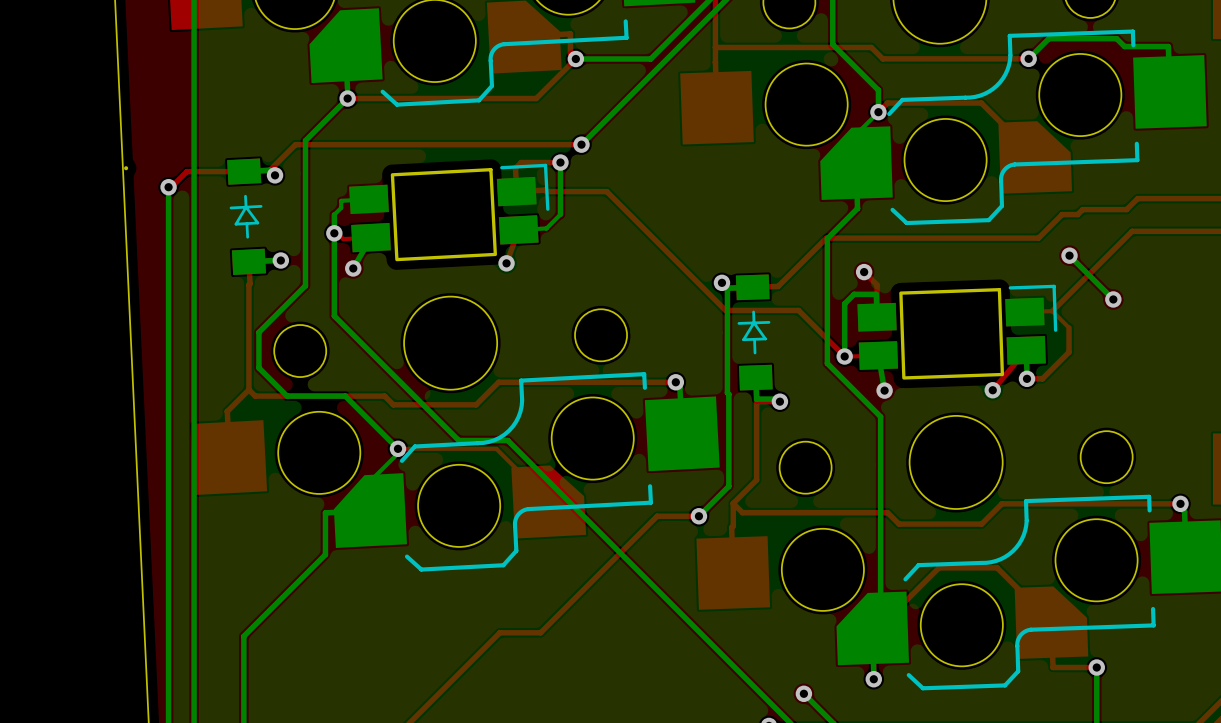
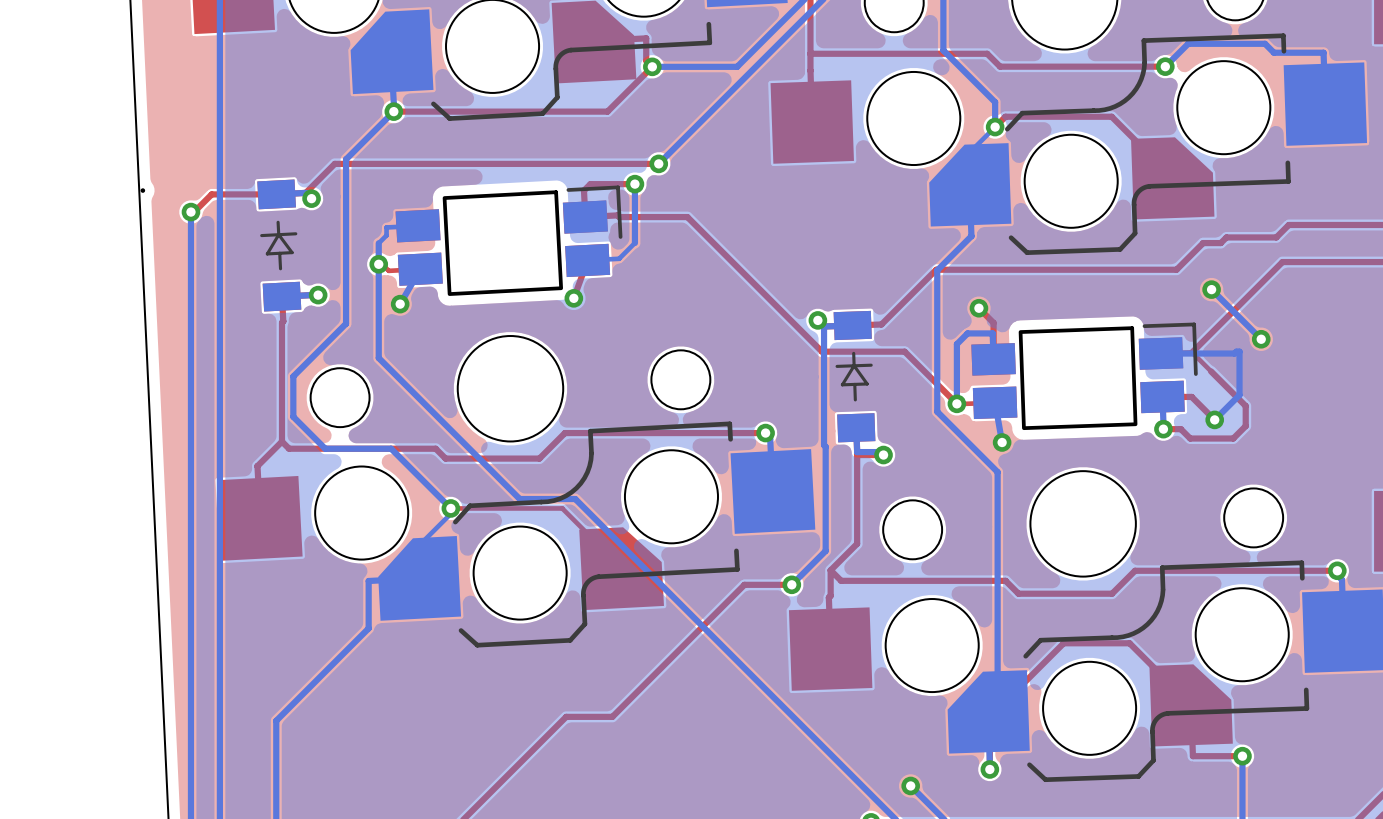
bottom track: none -> (1161, 353) (1234, 353) (1239, 351) (1239, 395) (1214, 419)
top track: (1069, 327) (1069, 352) (1042, 378) -> (1211, 371) (1245, 406) (1245, 426) (1233, 438) (1190, 438) (1180, 429)
top track: (1026, 350) (992, 390) -> (1162, 396) (1191, 396) (1214, 419)
via position: (992, 390) -> (1214, 419)

